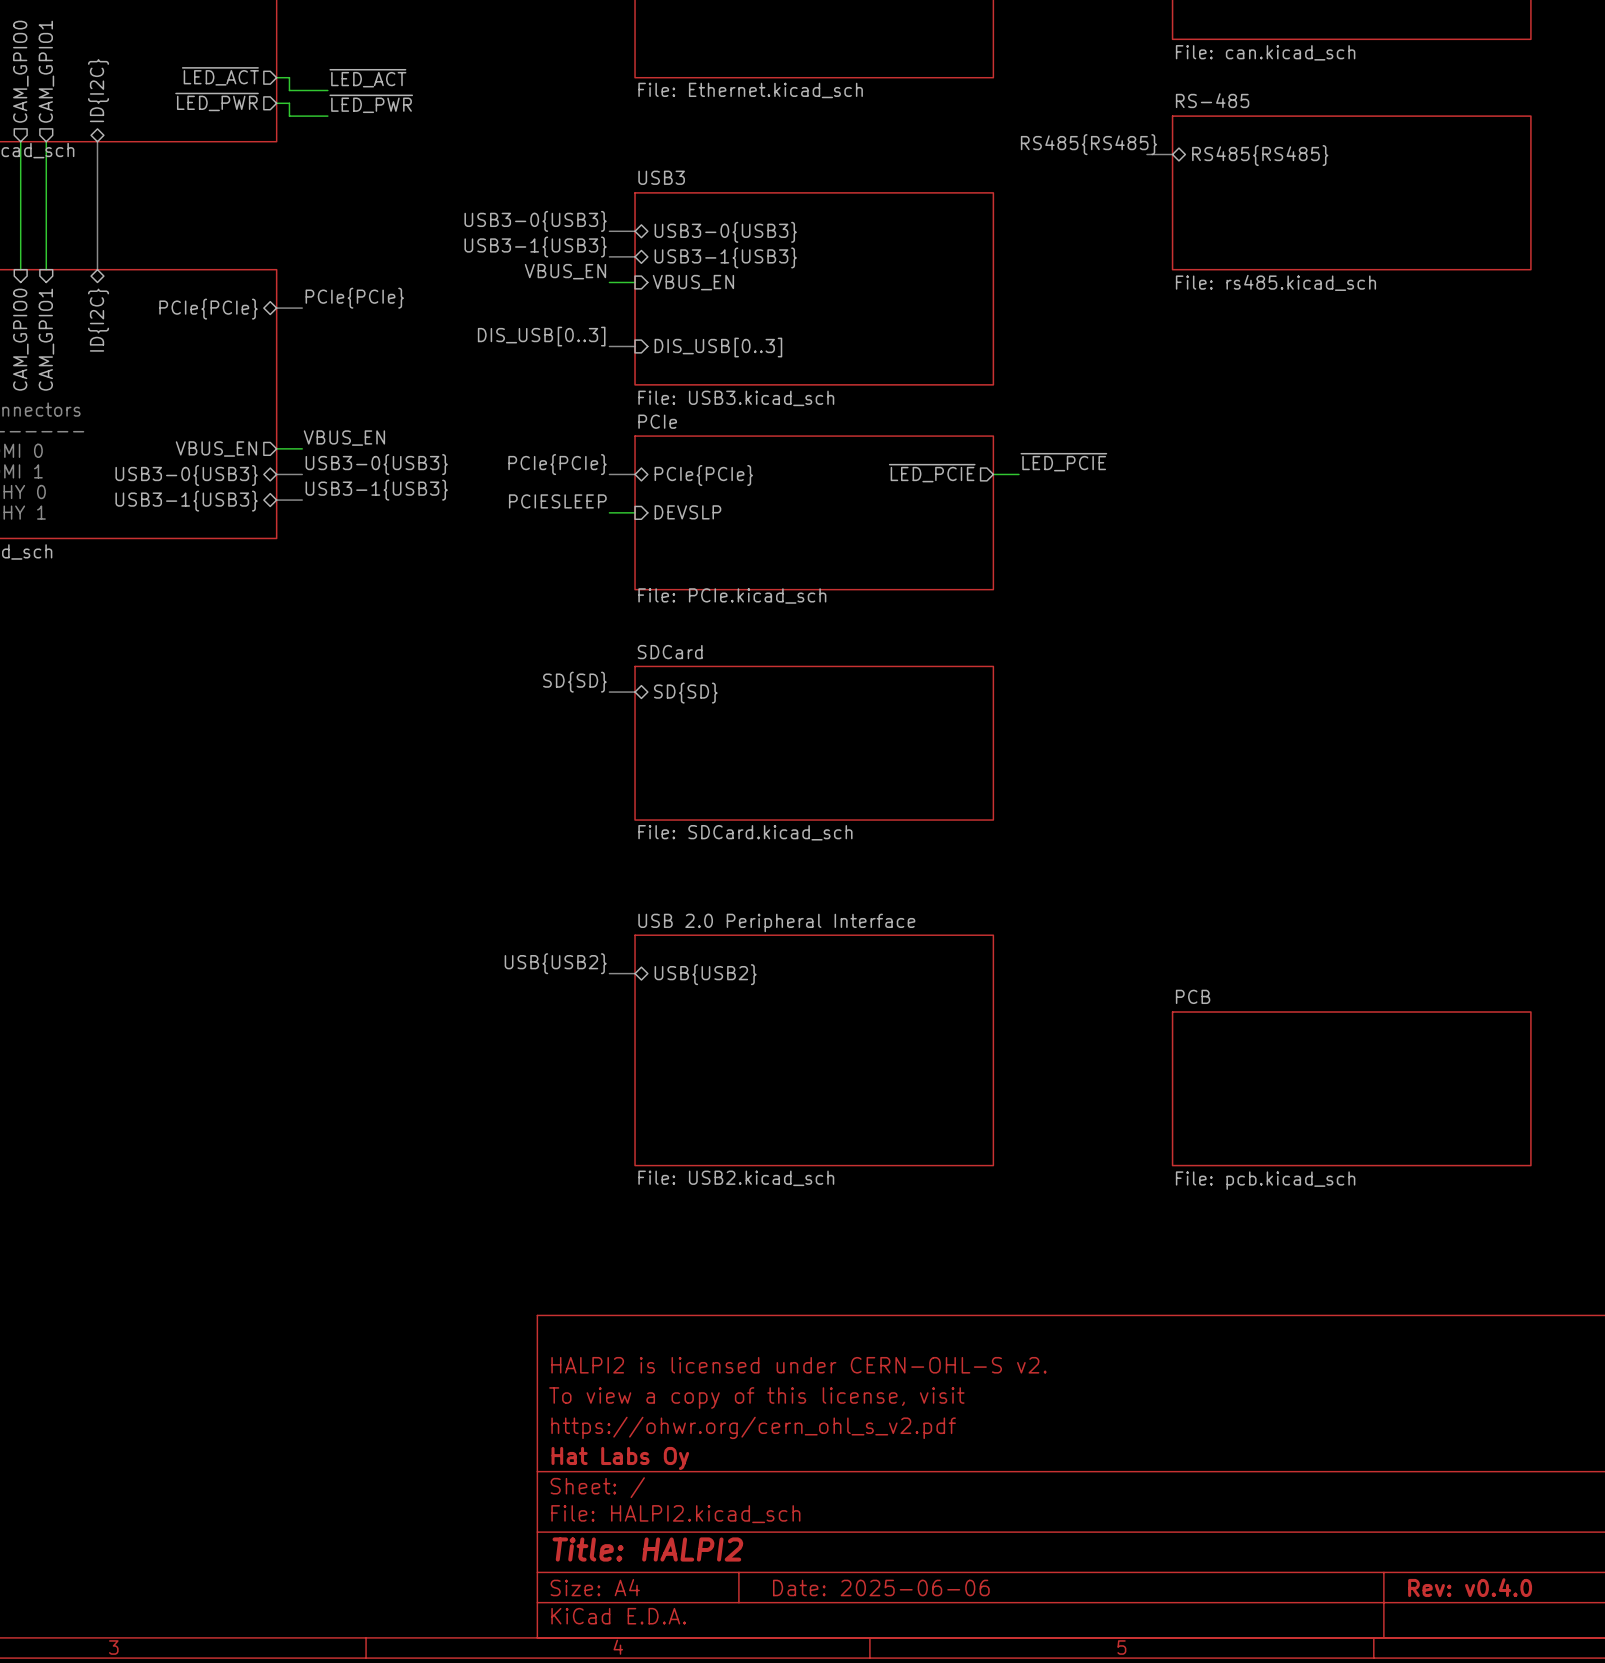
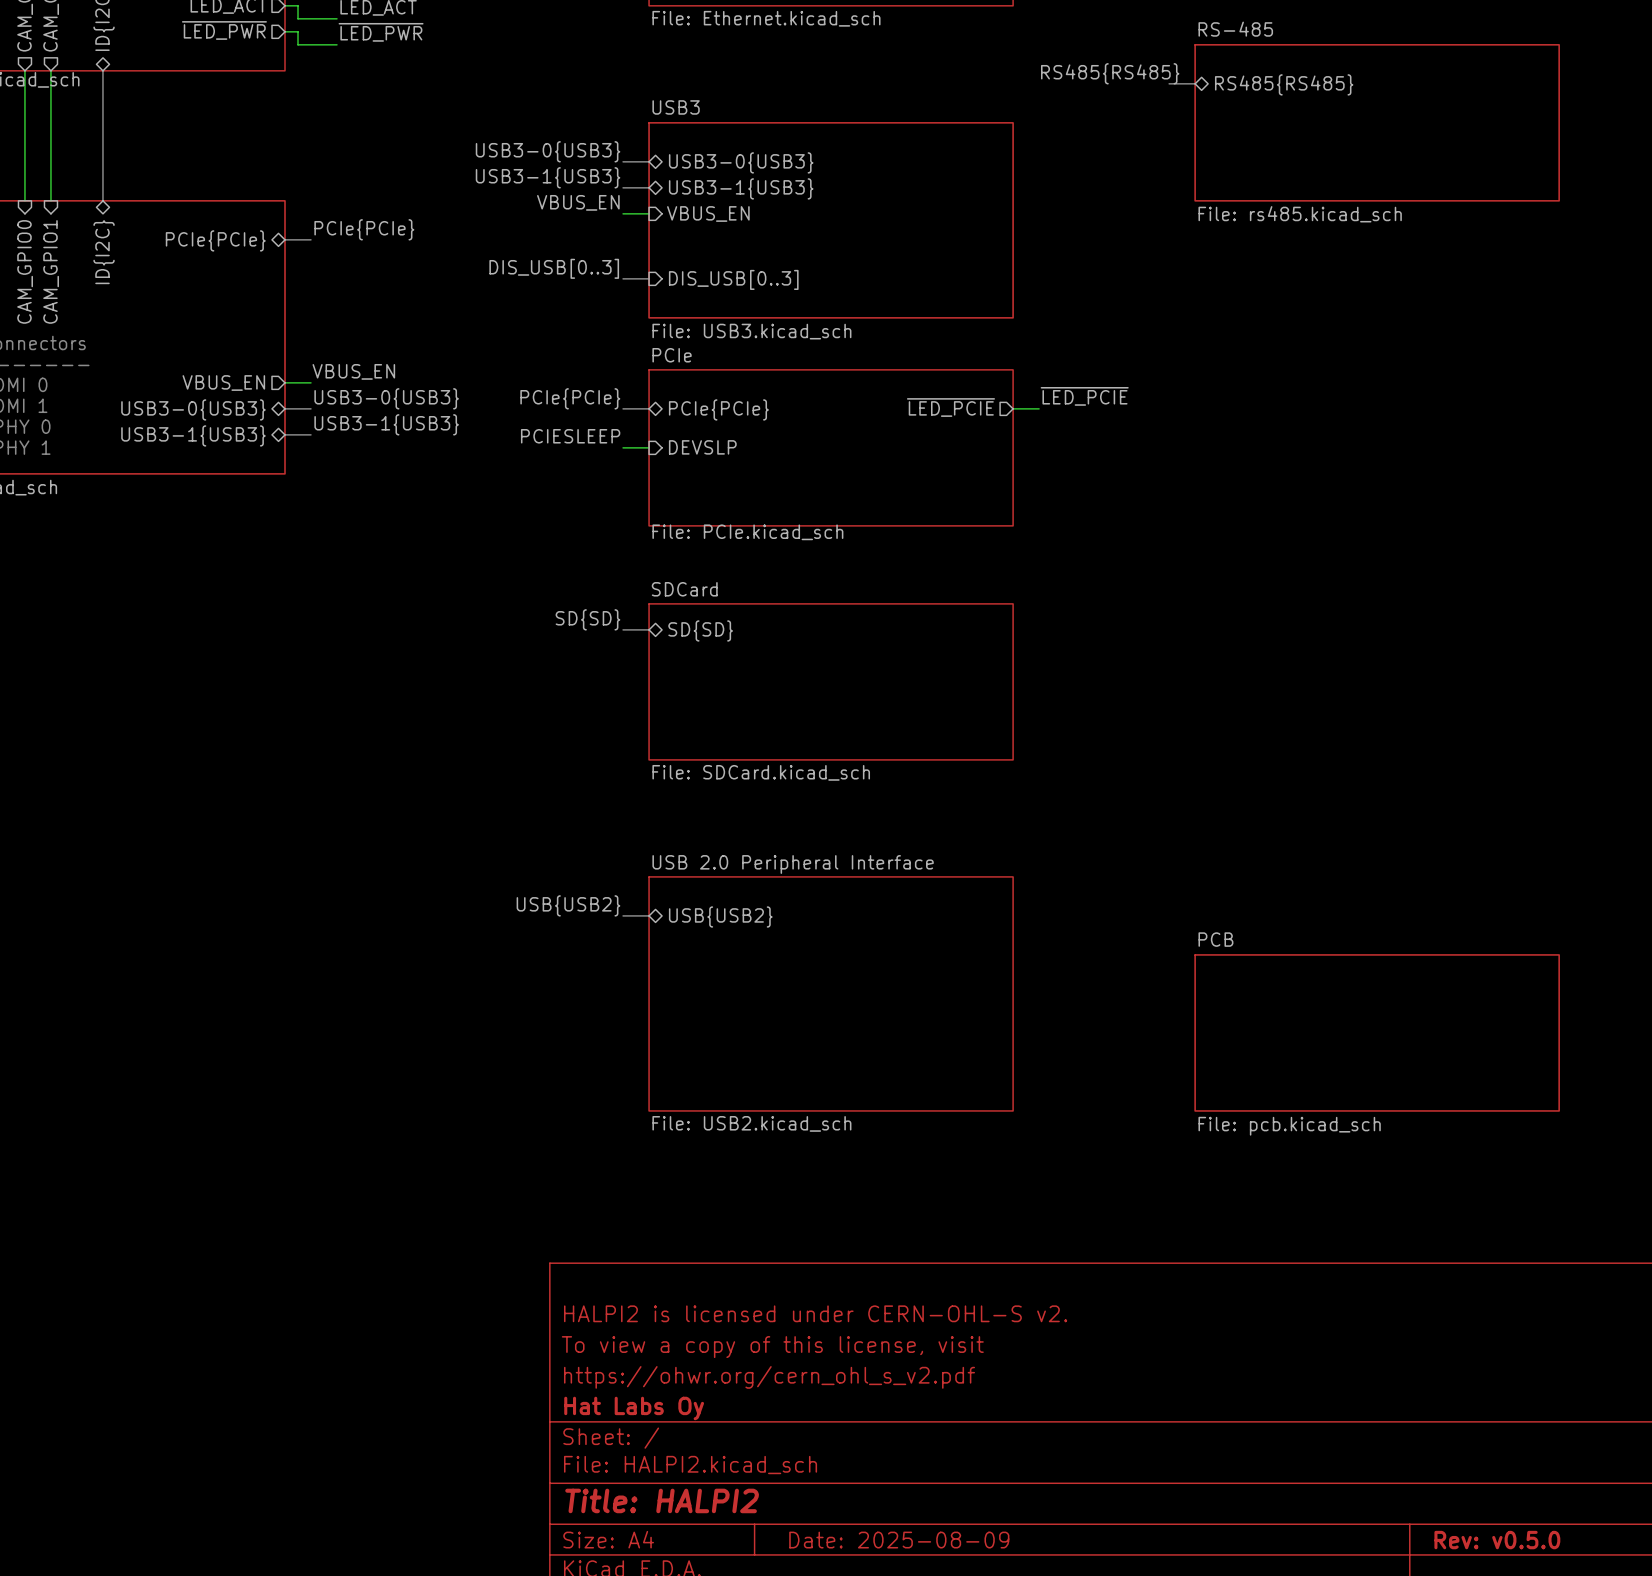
title block: Date: 2025-06-06 (881, 1587) -> Date: 2025-08-09 (899, 1540)
title block: Rev: v0.4.0 (1470, 1587) -> Rev: v0.5.0 (1497, 1540)

